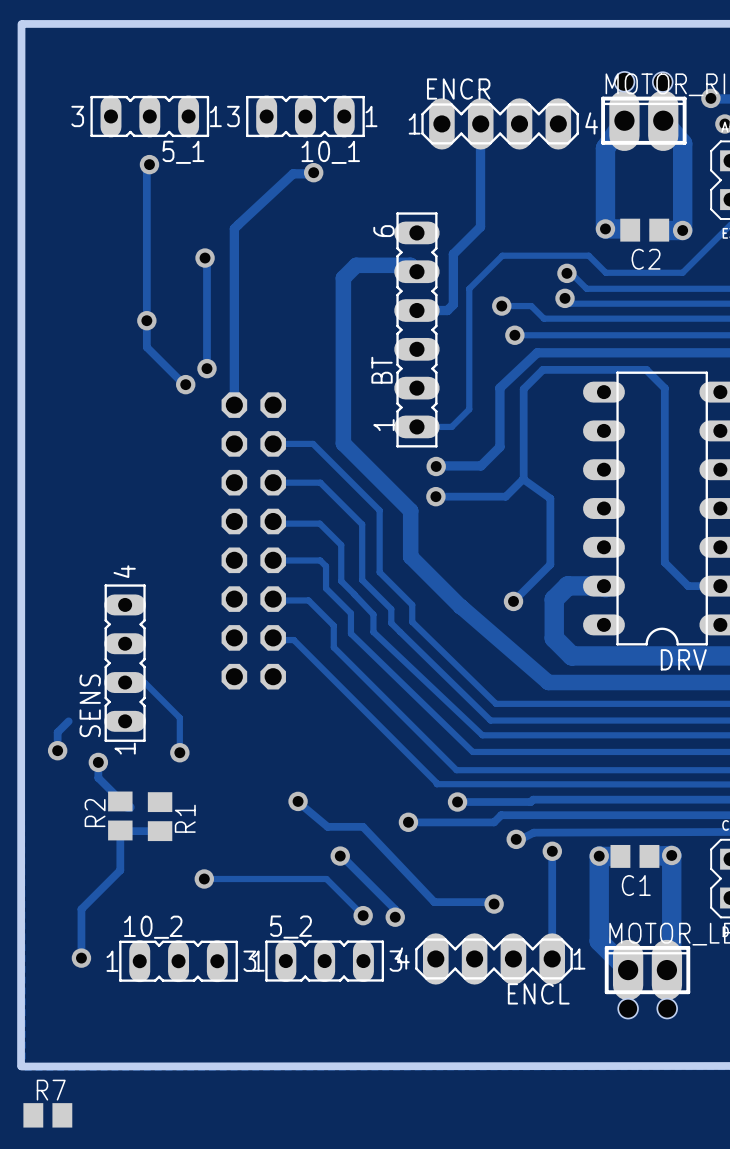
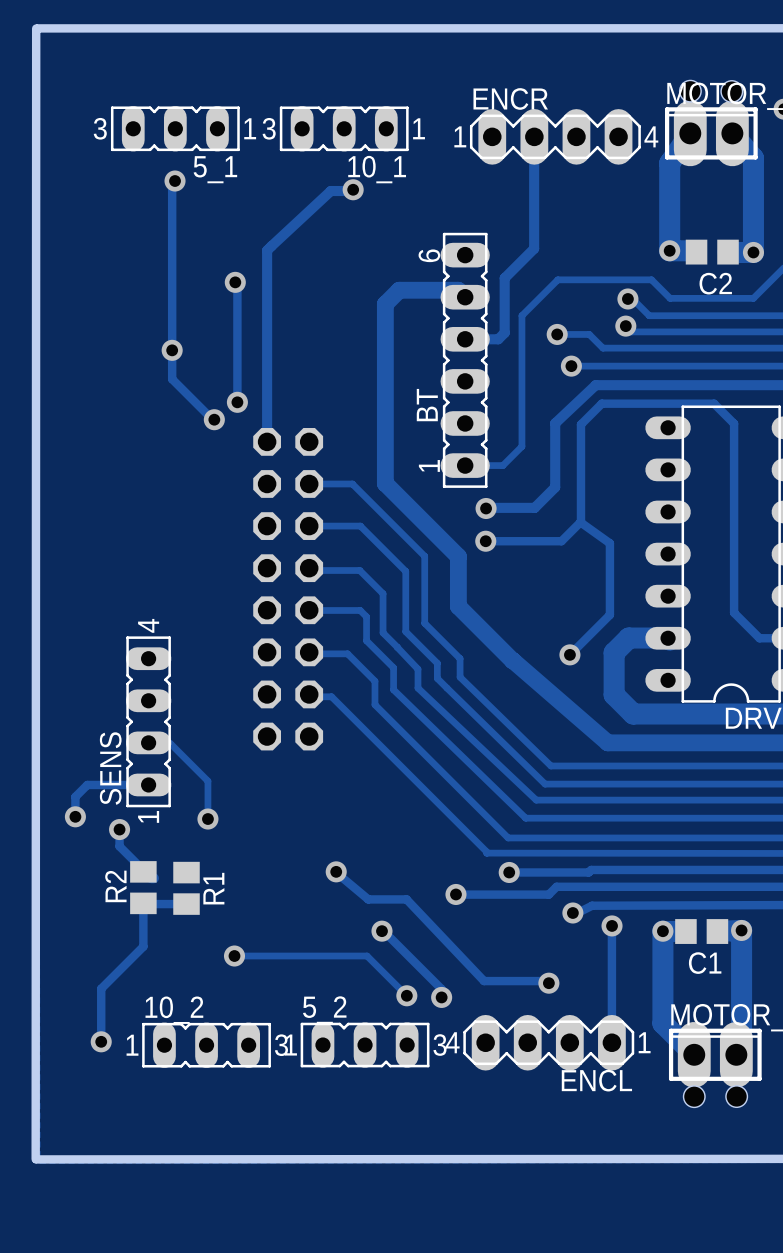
track: none -> (87, 784) (148, 784)
R7: (47, 1115) -> none

